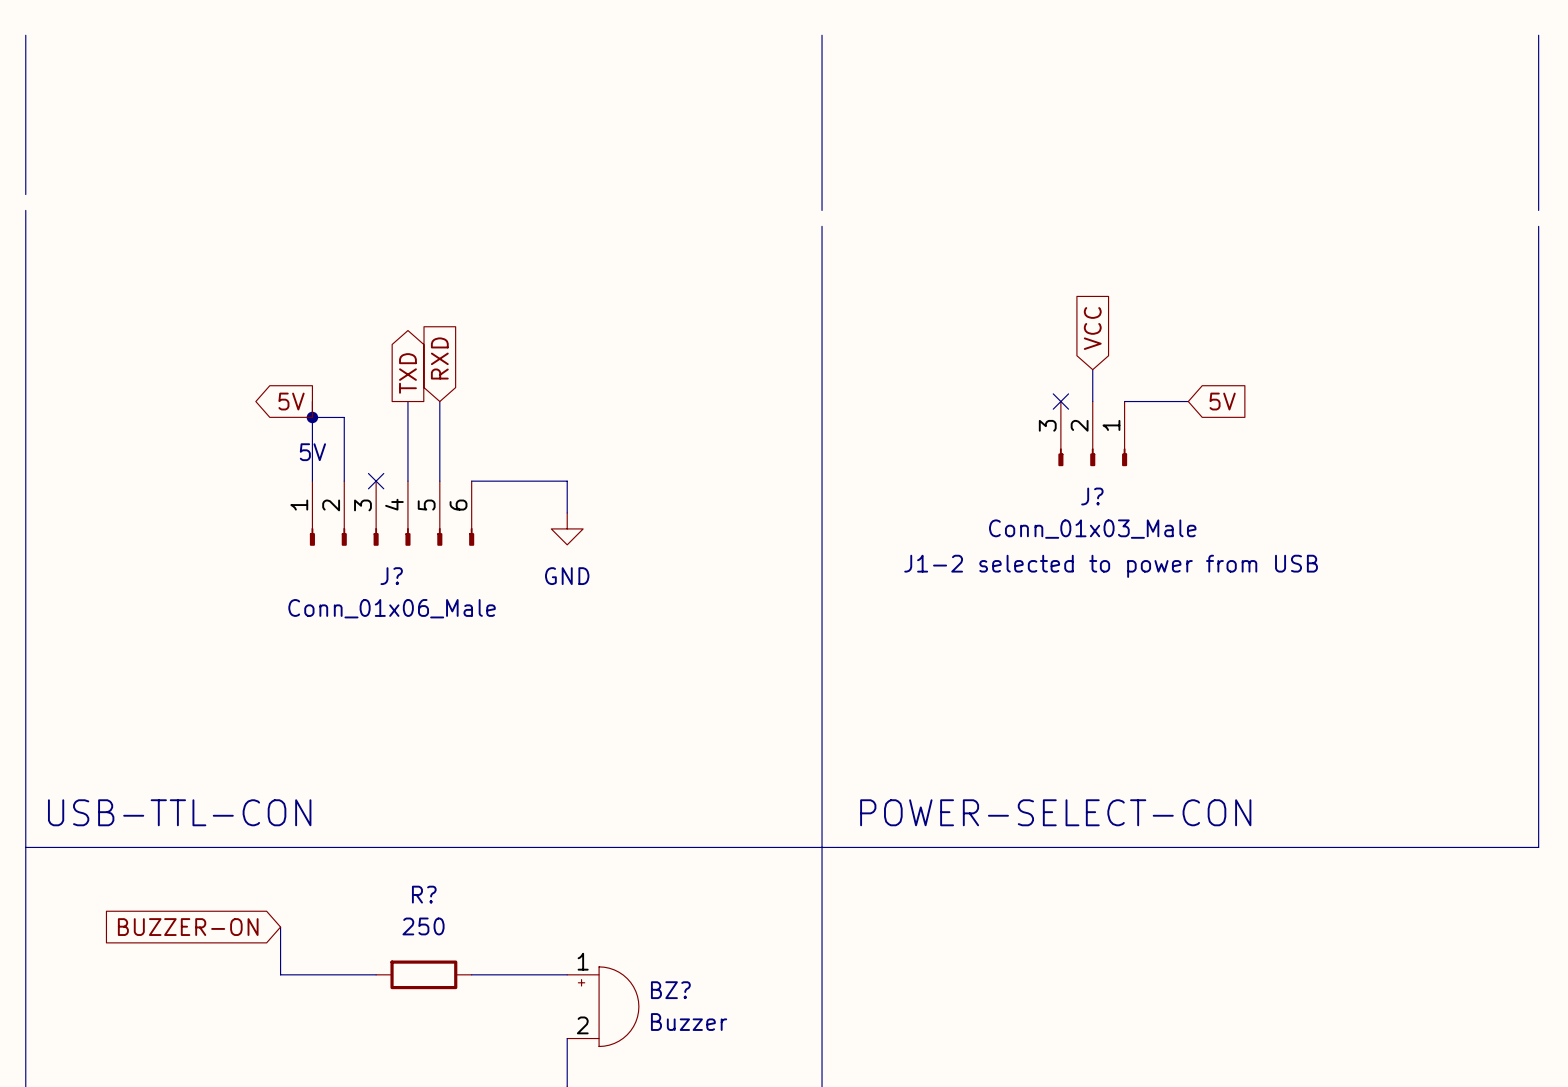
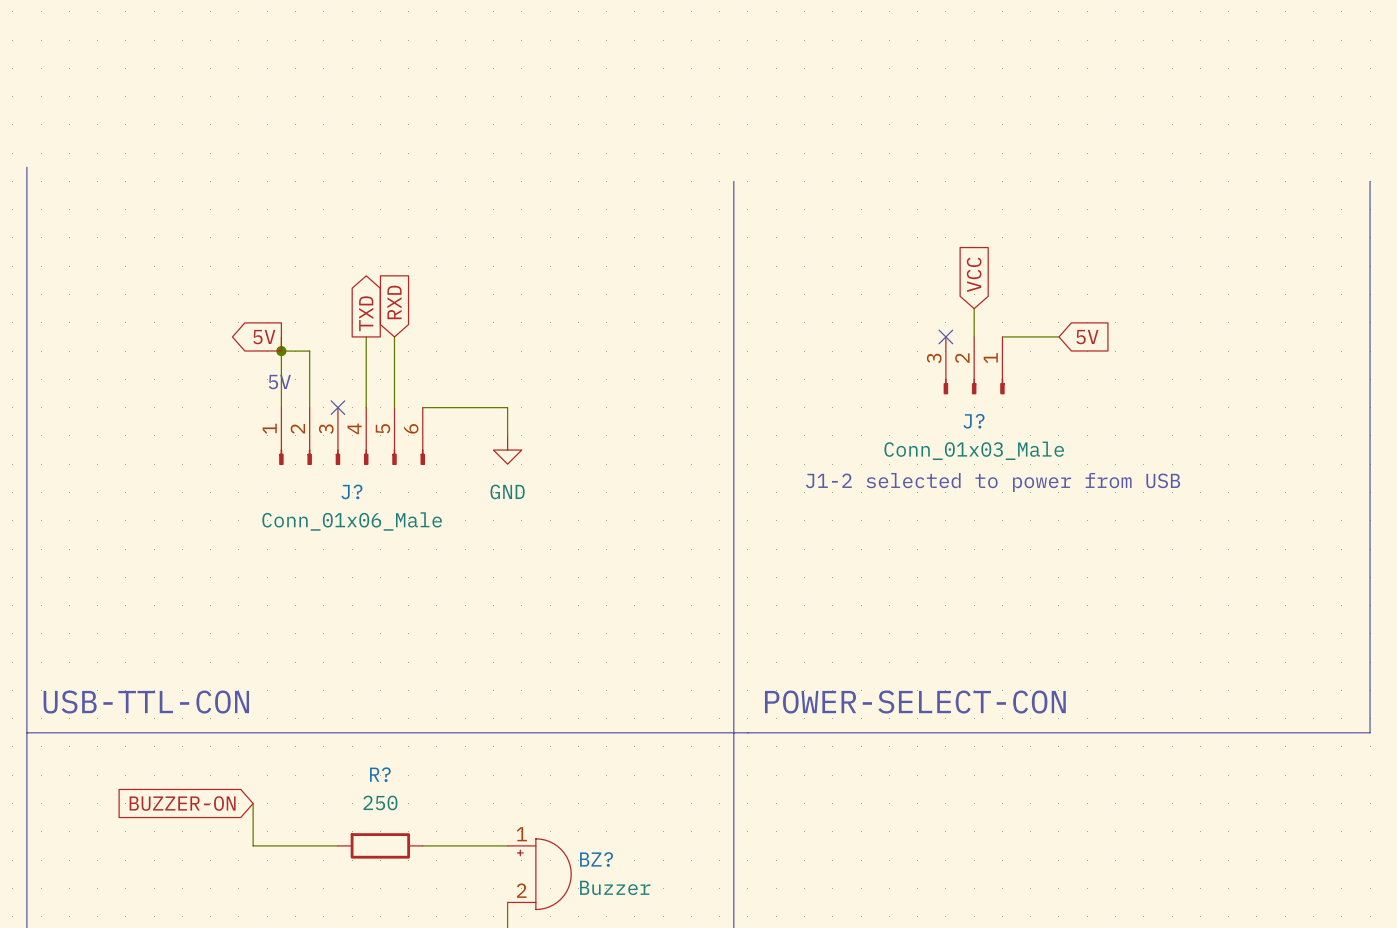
line: (25, 35) (25, 194) -> none
line: (822, 35) (822, 210) -> none
line: (1538, 35) (1538, 210) -> none

